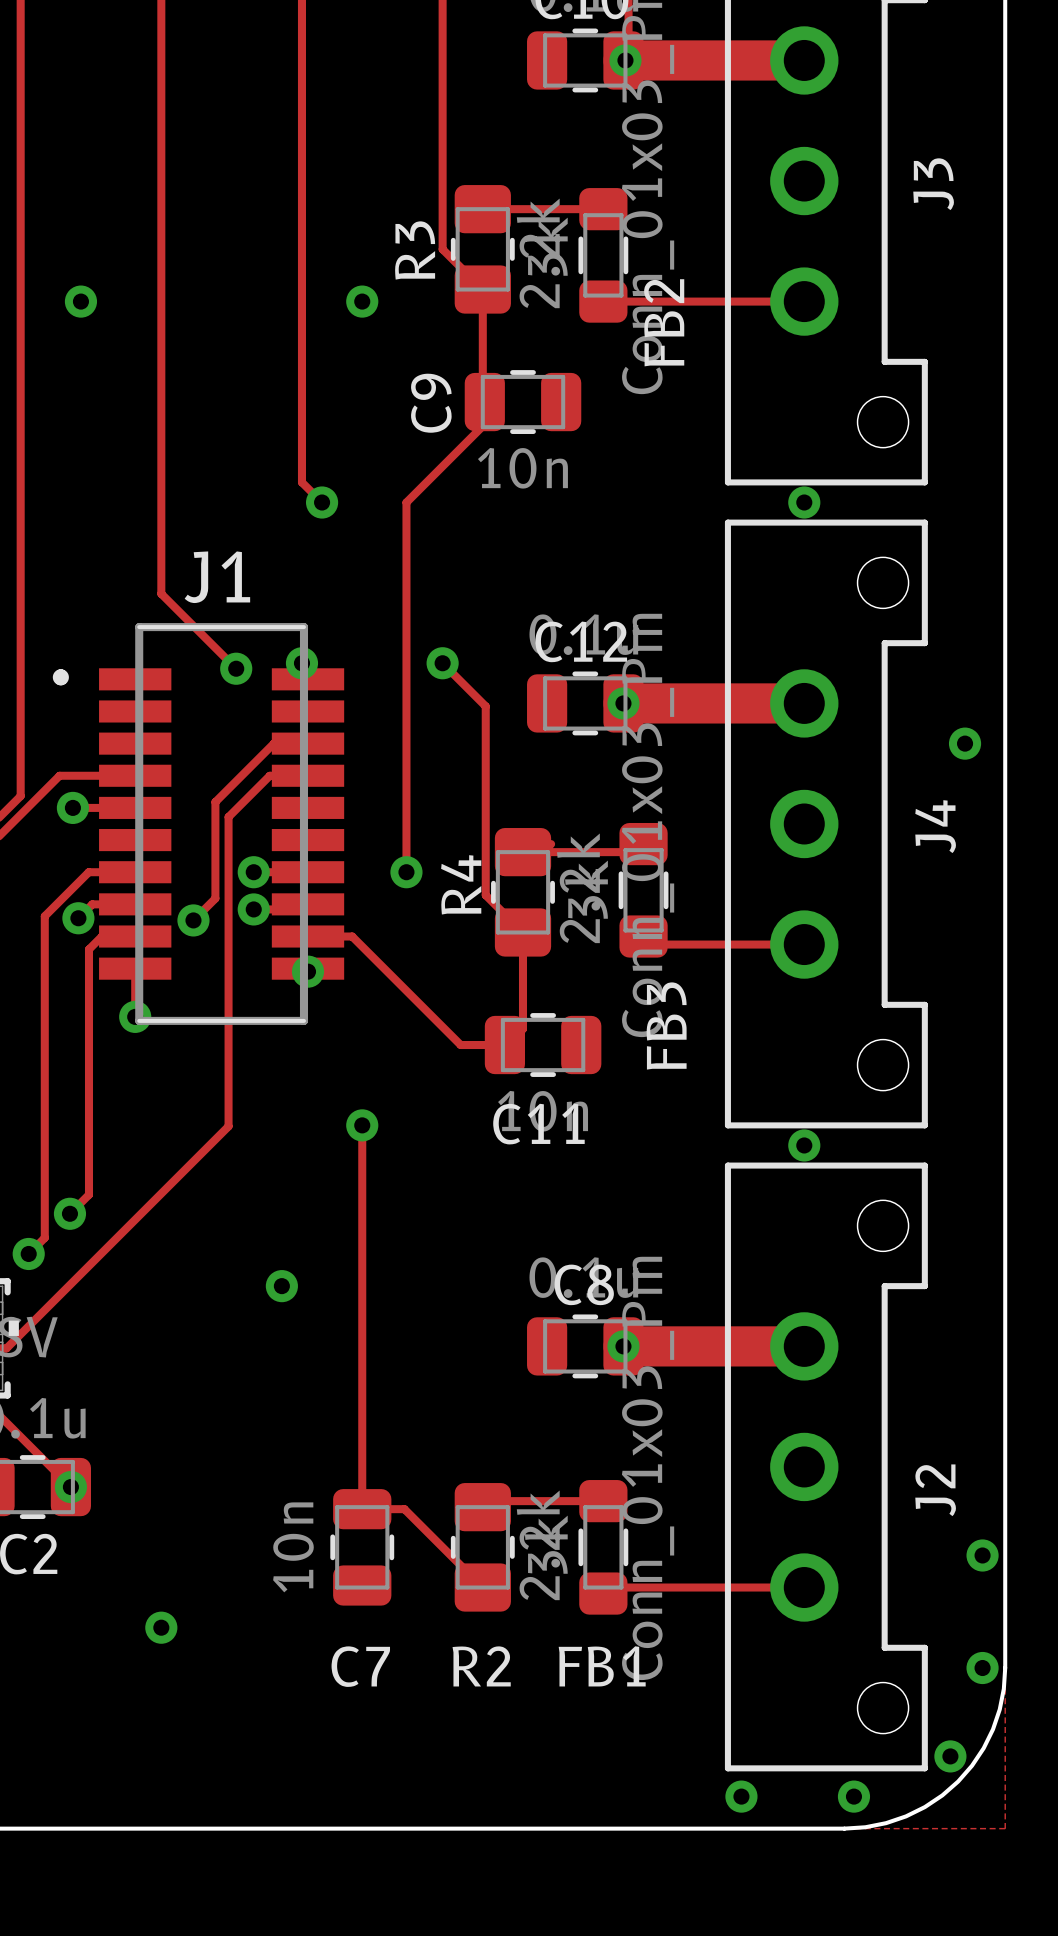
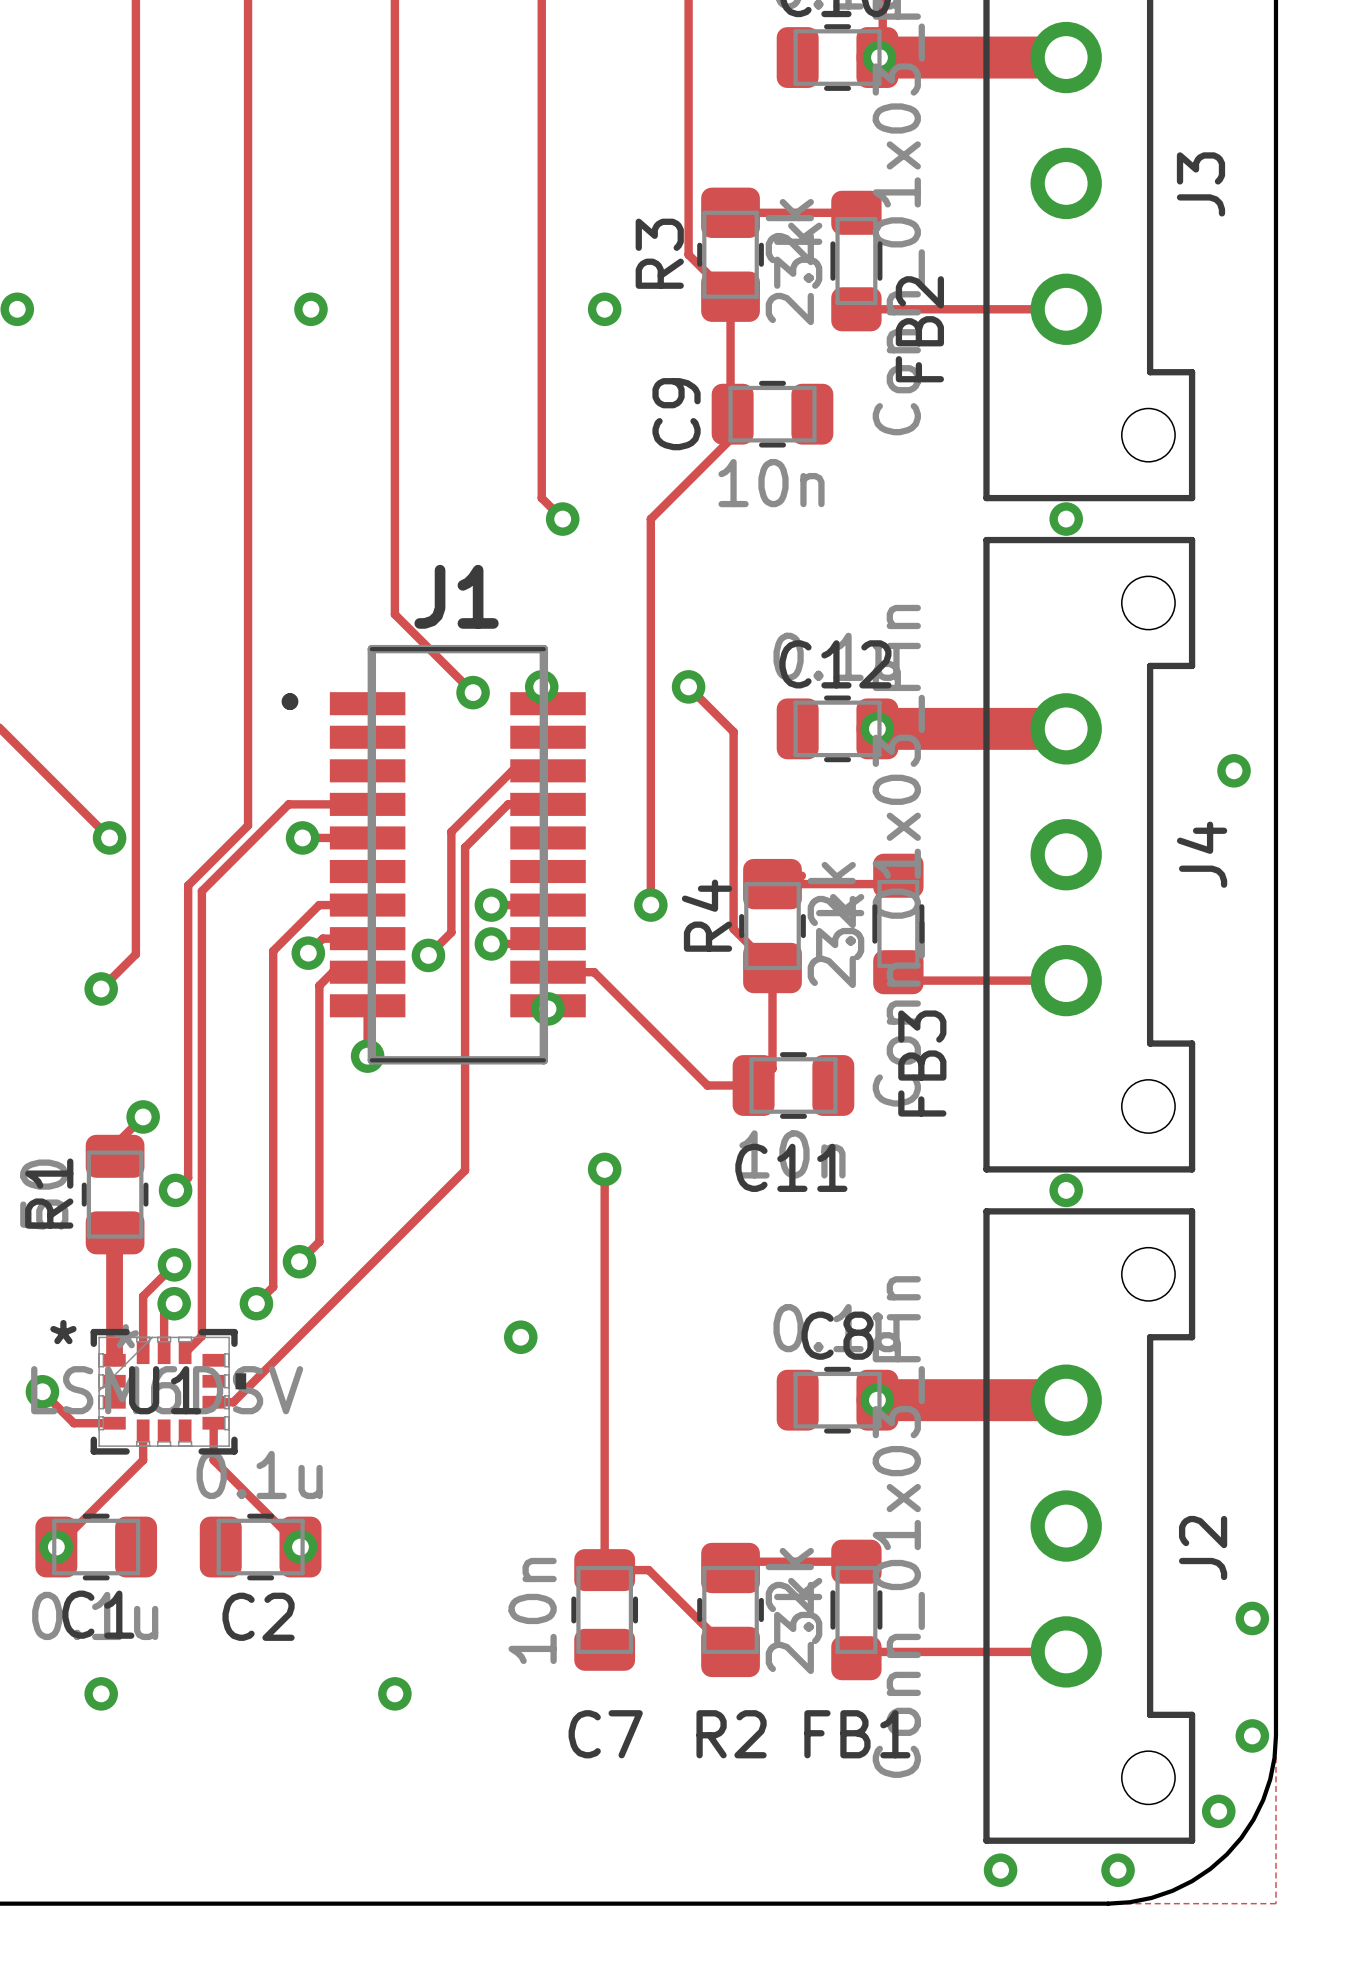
via position: (950, 1756) -> (1218, 1811)

